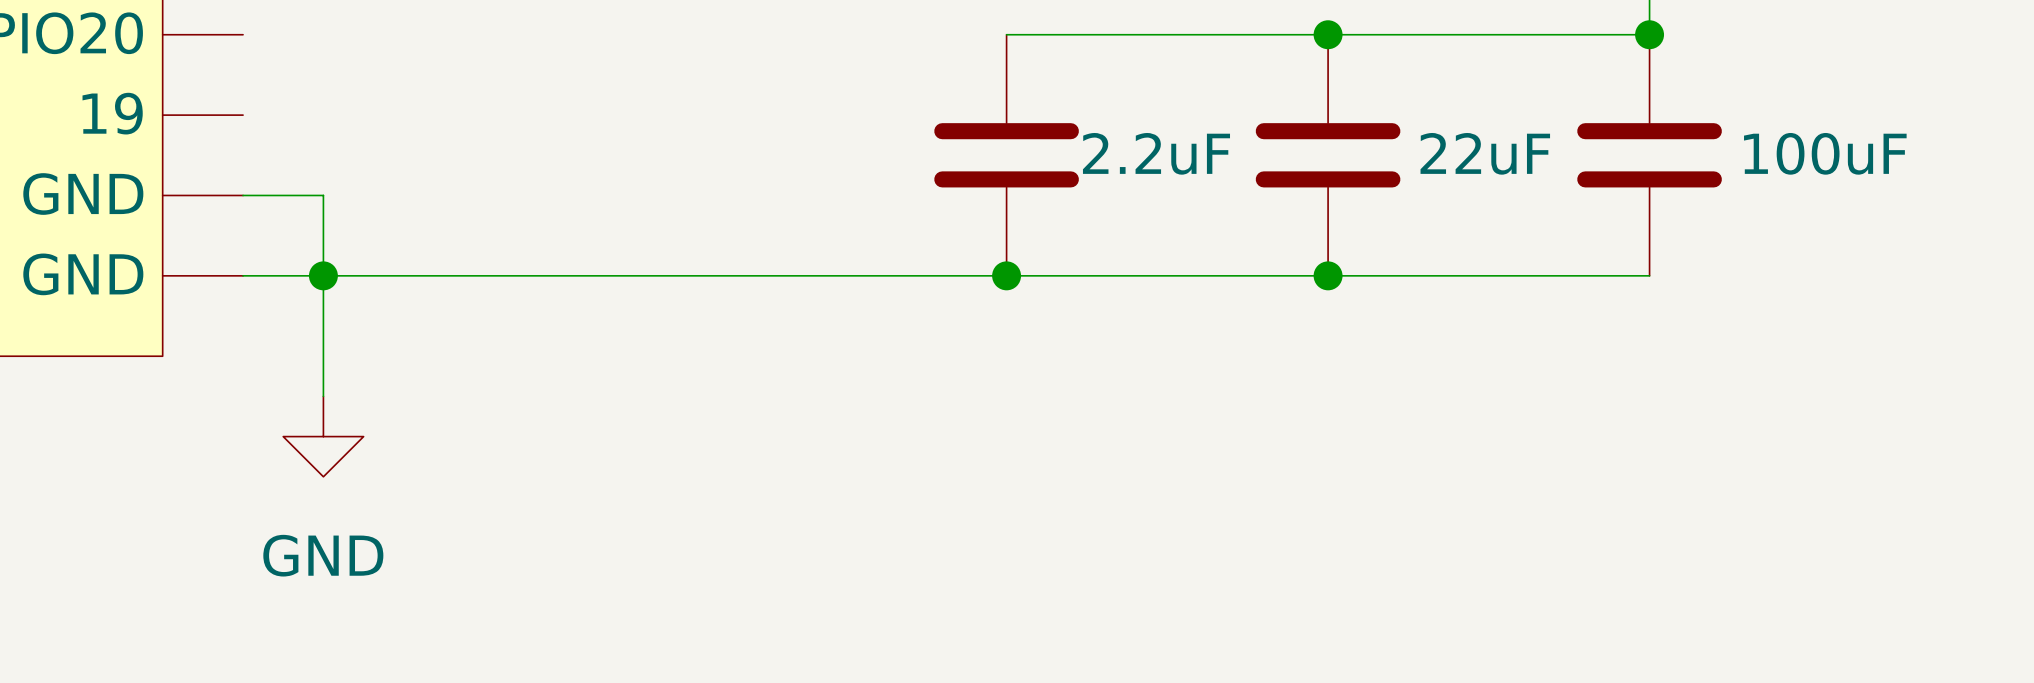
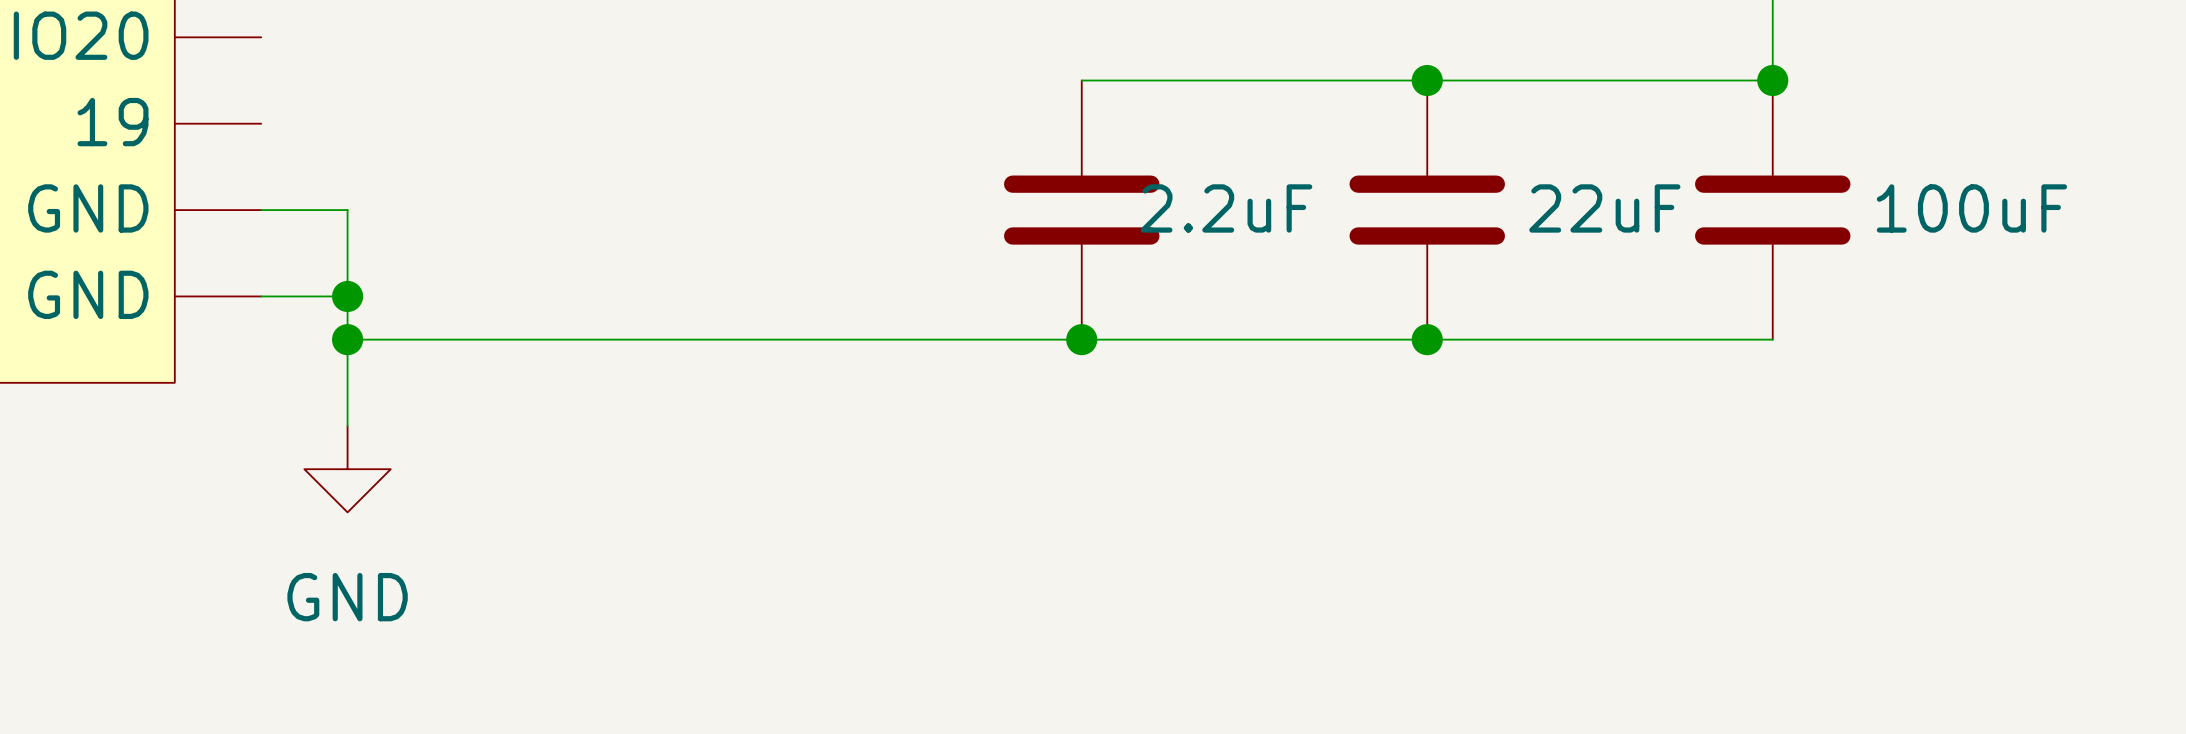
wire: (1006, 34) (1649, 34) -> (1081, 80) (1772, 80) (1772, 37)
junction position: (1328, 34) -> (1427, 80)
junction position: (1649, 34) -> (1772, 80)
2.2uF name position: 2.2uF (1156, 153) -> 2.2uF (1226, 208)
2.2uF position: (1006, 155) -> (1081, 210)
22uF position: (1328, 155) -> (1427, 210)
100uF position: (1649, 155) -> (1772, 210)
wire: (323, 275) (1649, 275) -> (347, 339) (1772, 339)
junction position: (1006, 275) -> (1081, 339)
junction position: (1328, 275) -> (1427, 339)
junction: none -> (347, 339)

